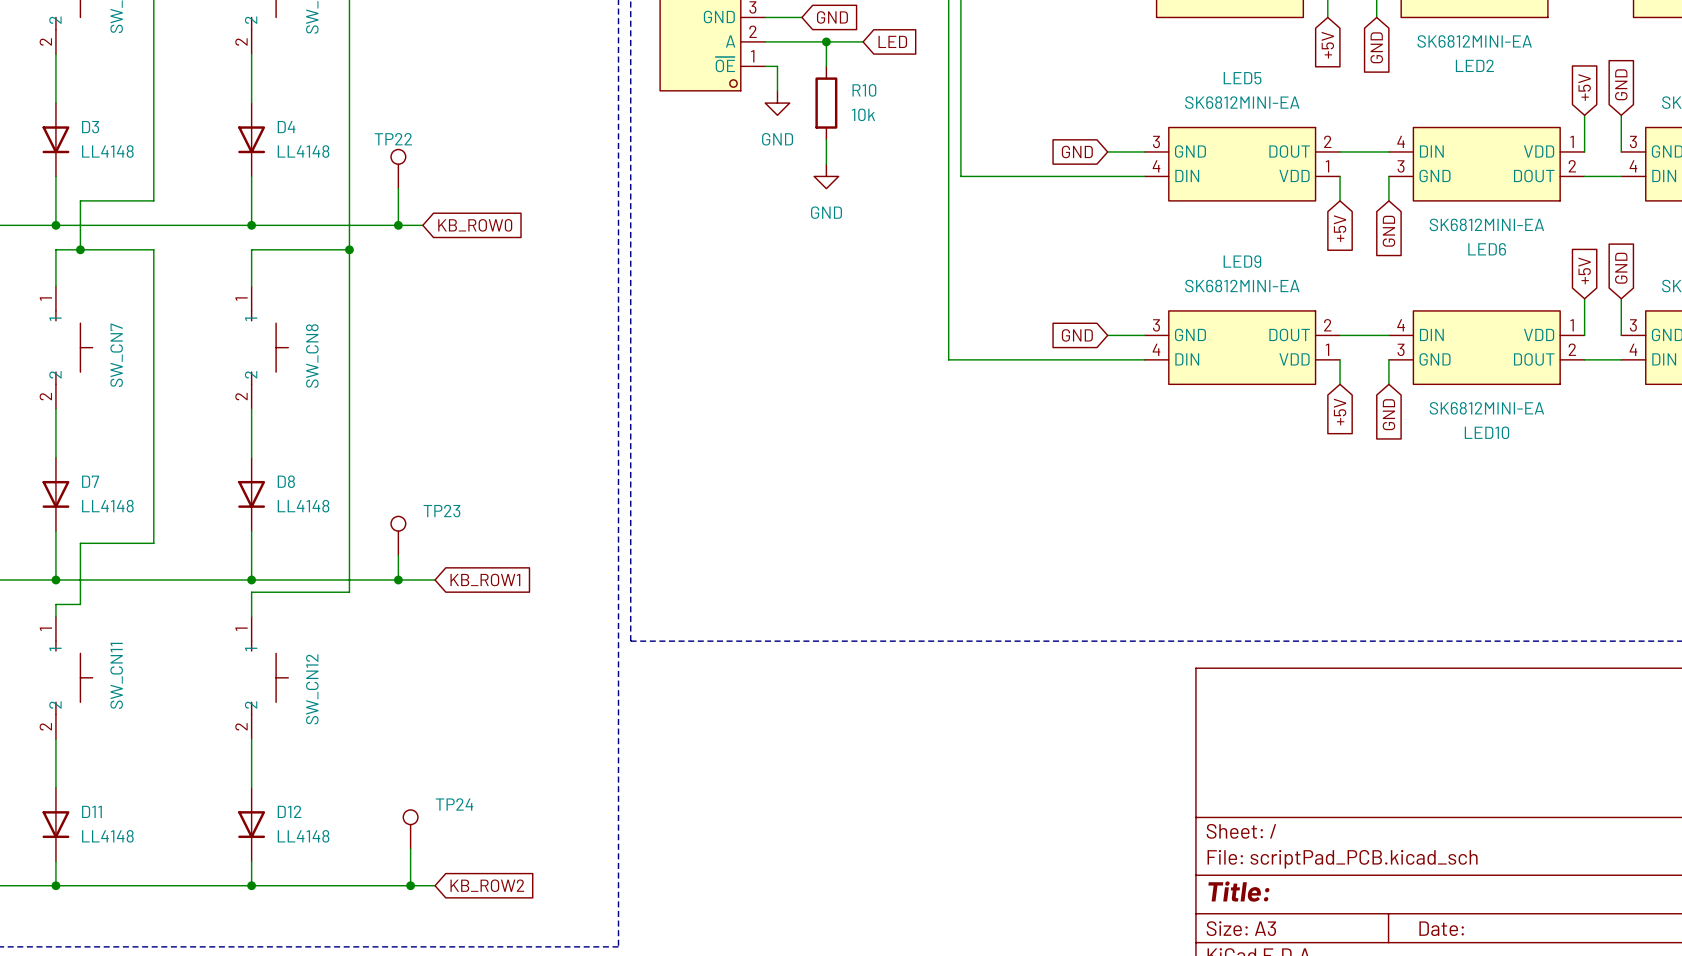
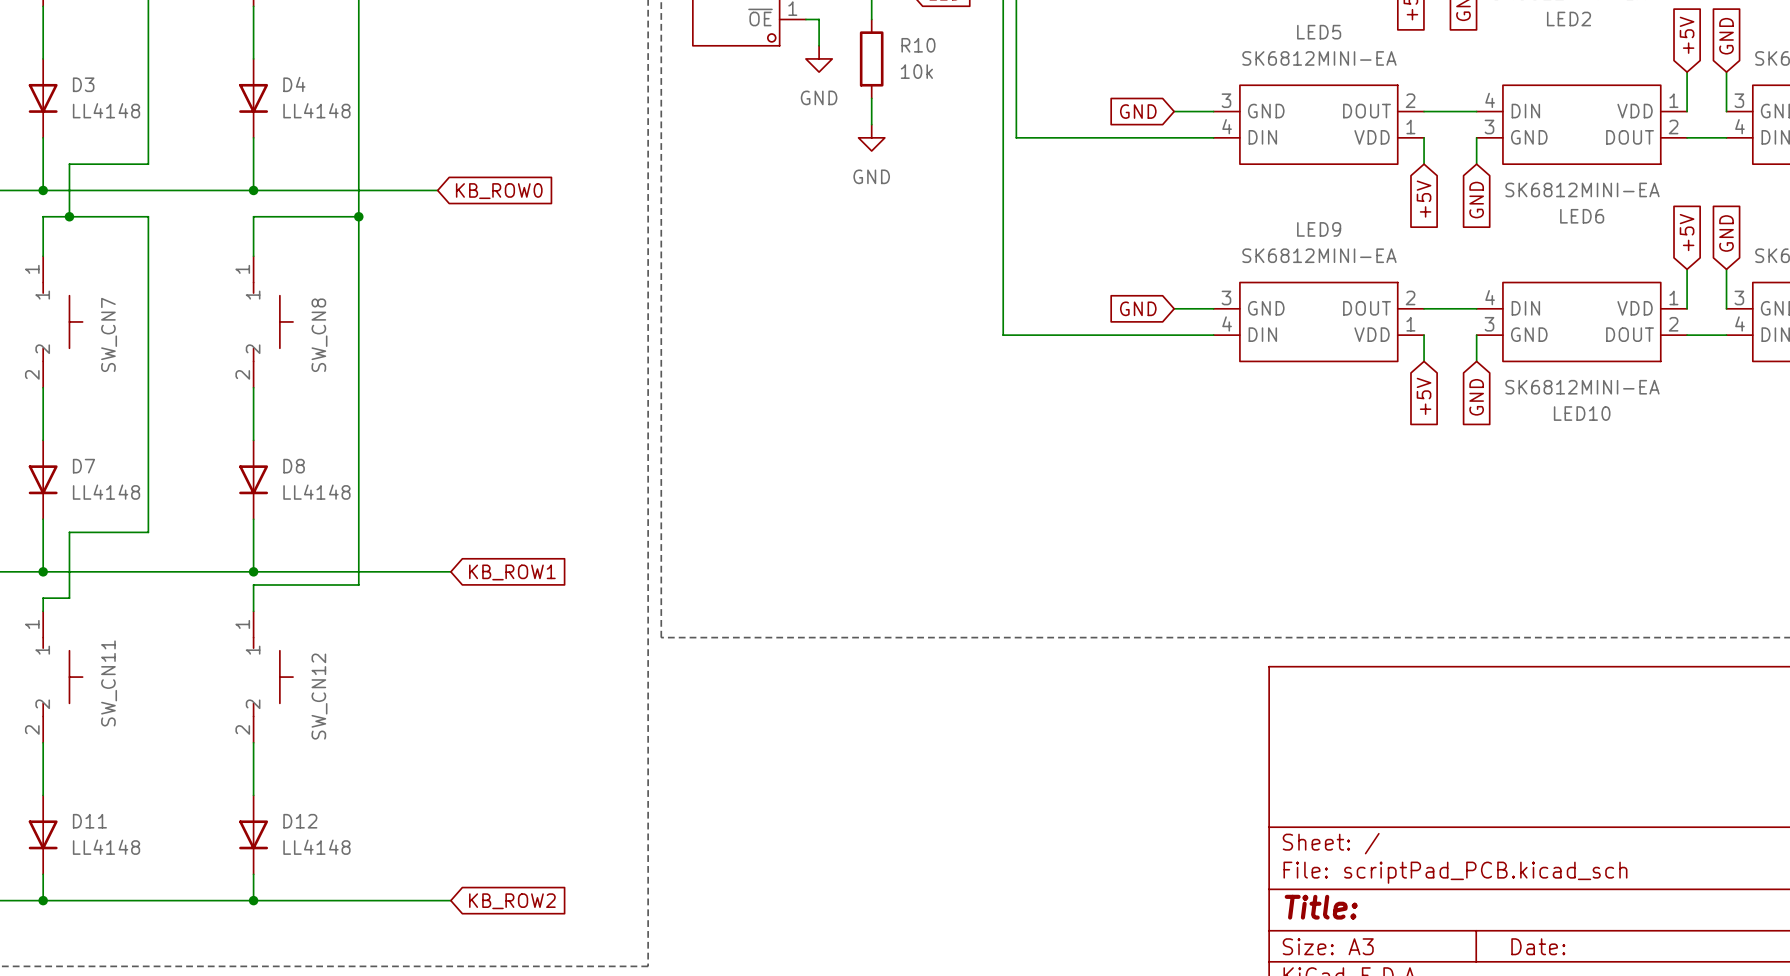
TP22: (398, 169) -> none
wire: (398, 188) (398, 225) -> none
junction: (398, 225) -> none
TP23: (398, 535) -> none
wire: (398, 555) (398, 580) -> none
junction: (398, 580) -> none
TP24: (410, 829) -> none
wire: (410, 849) (410, 885) -> none
junction: (410, 885) -> none

